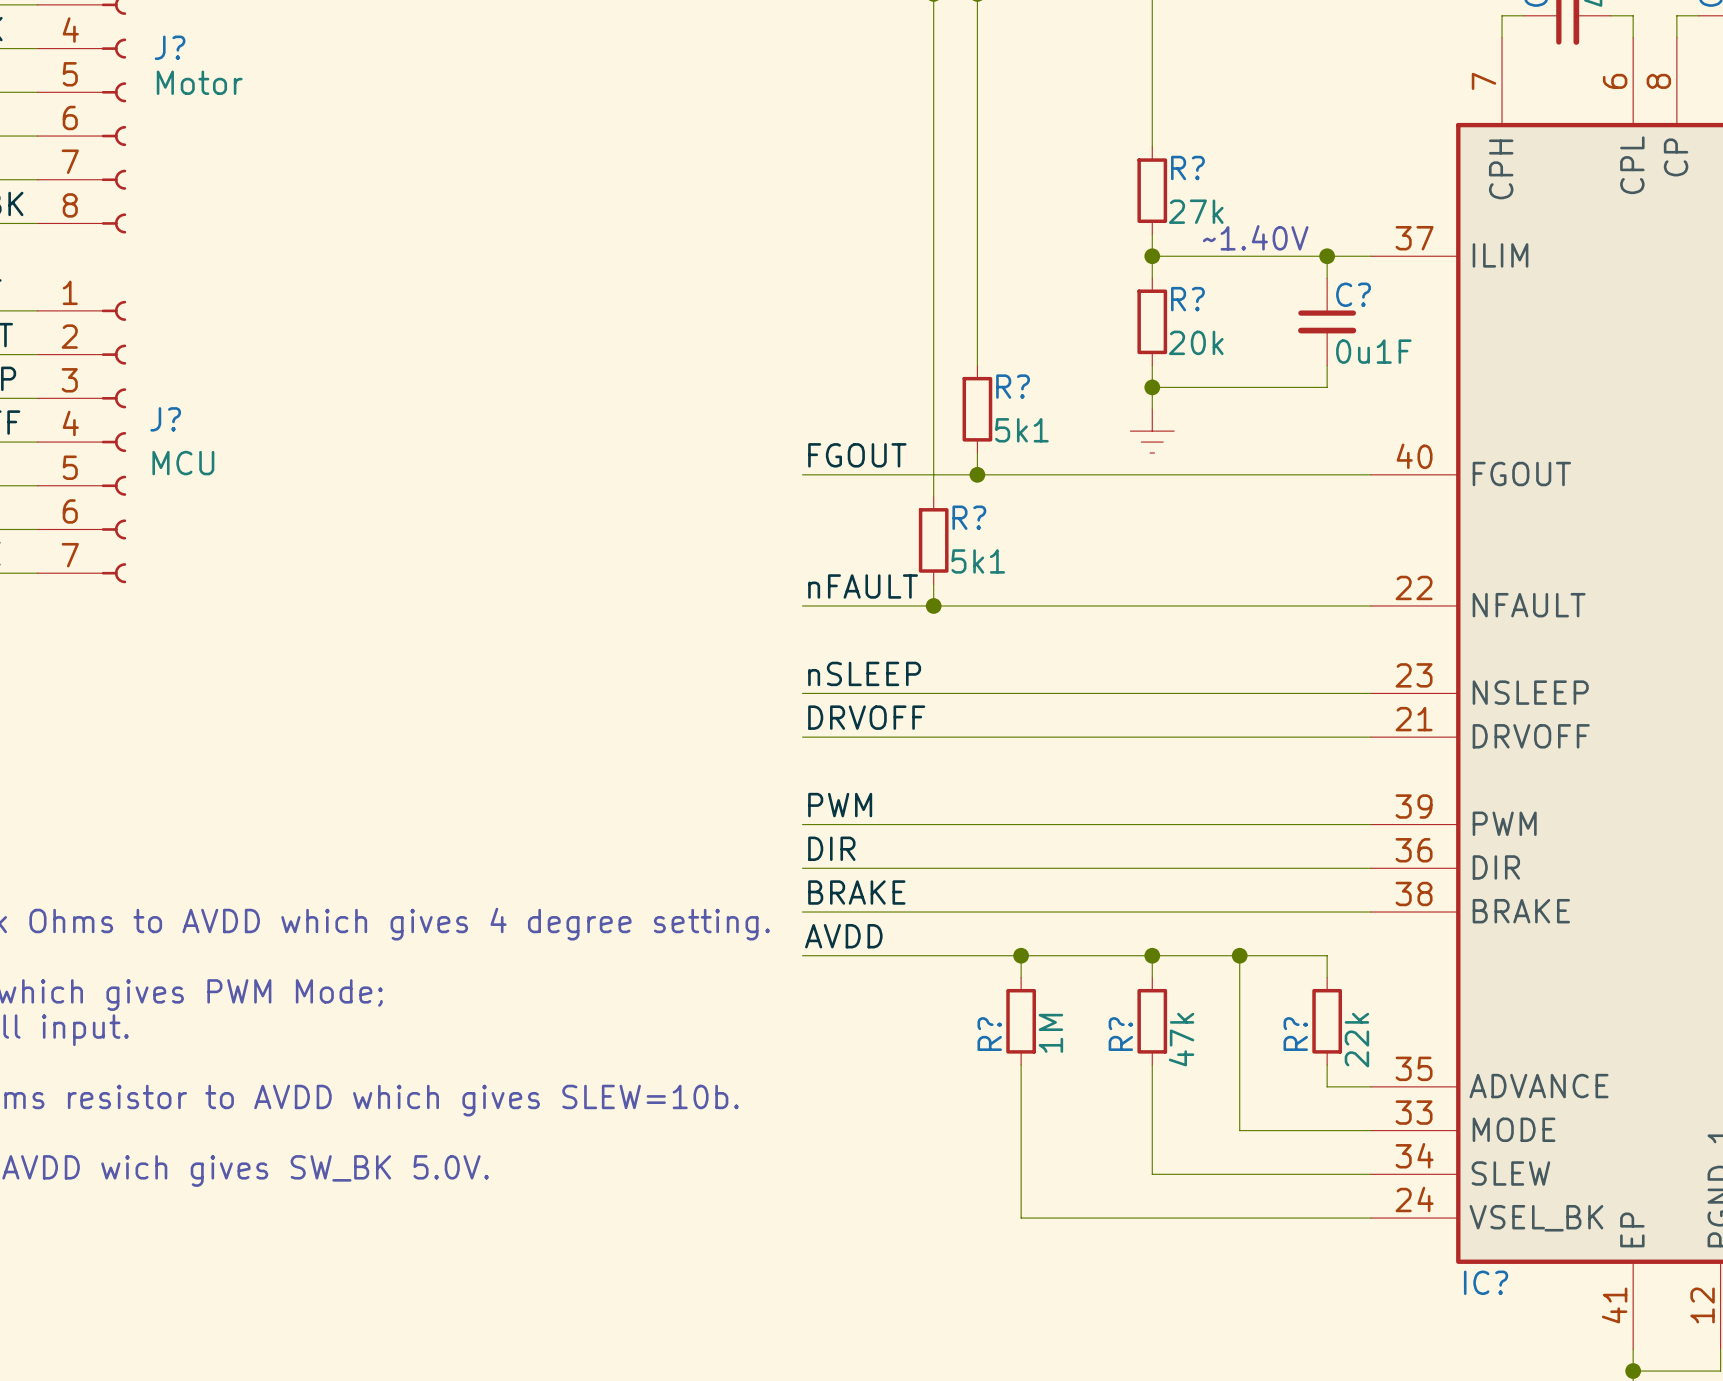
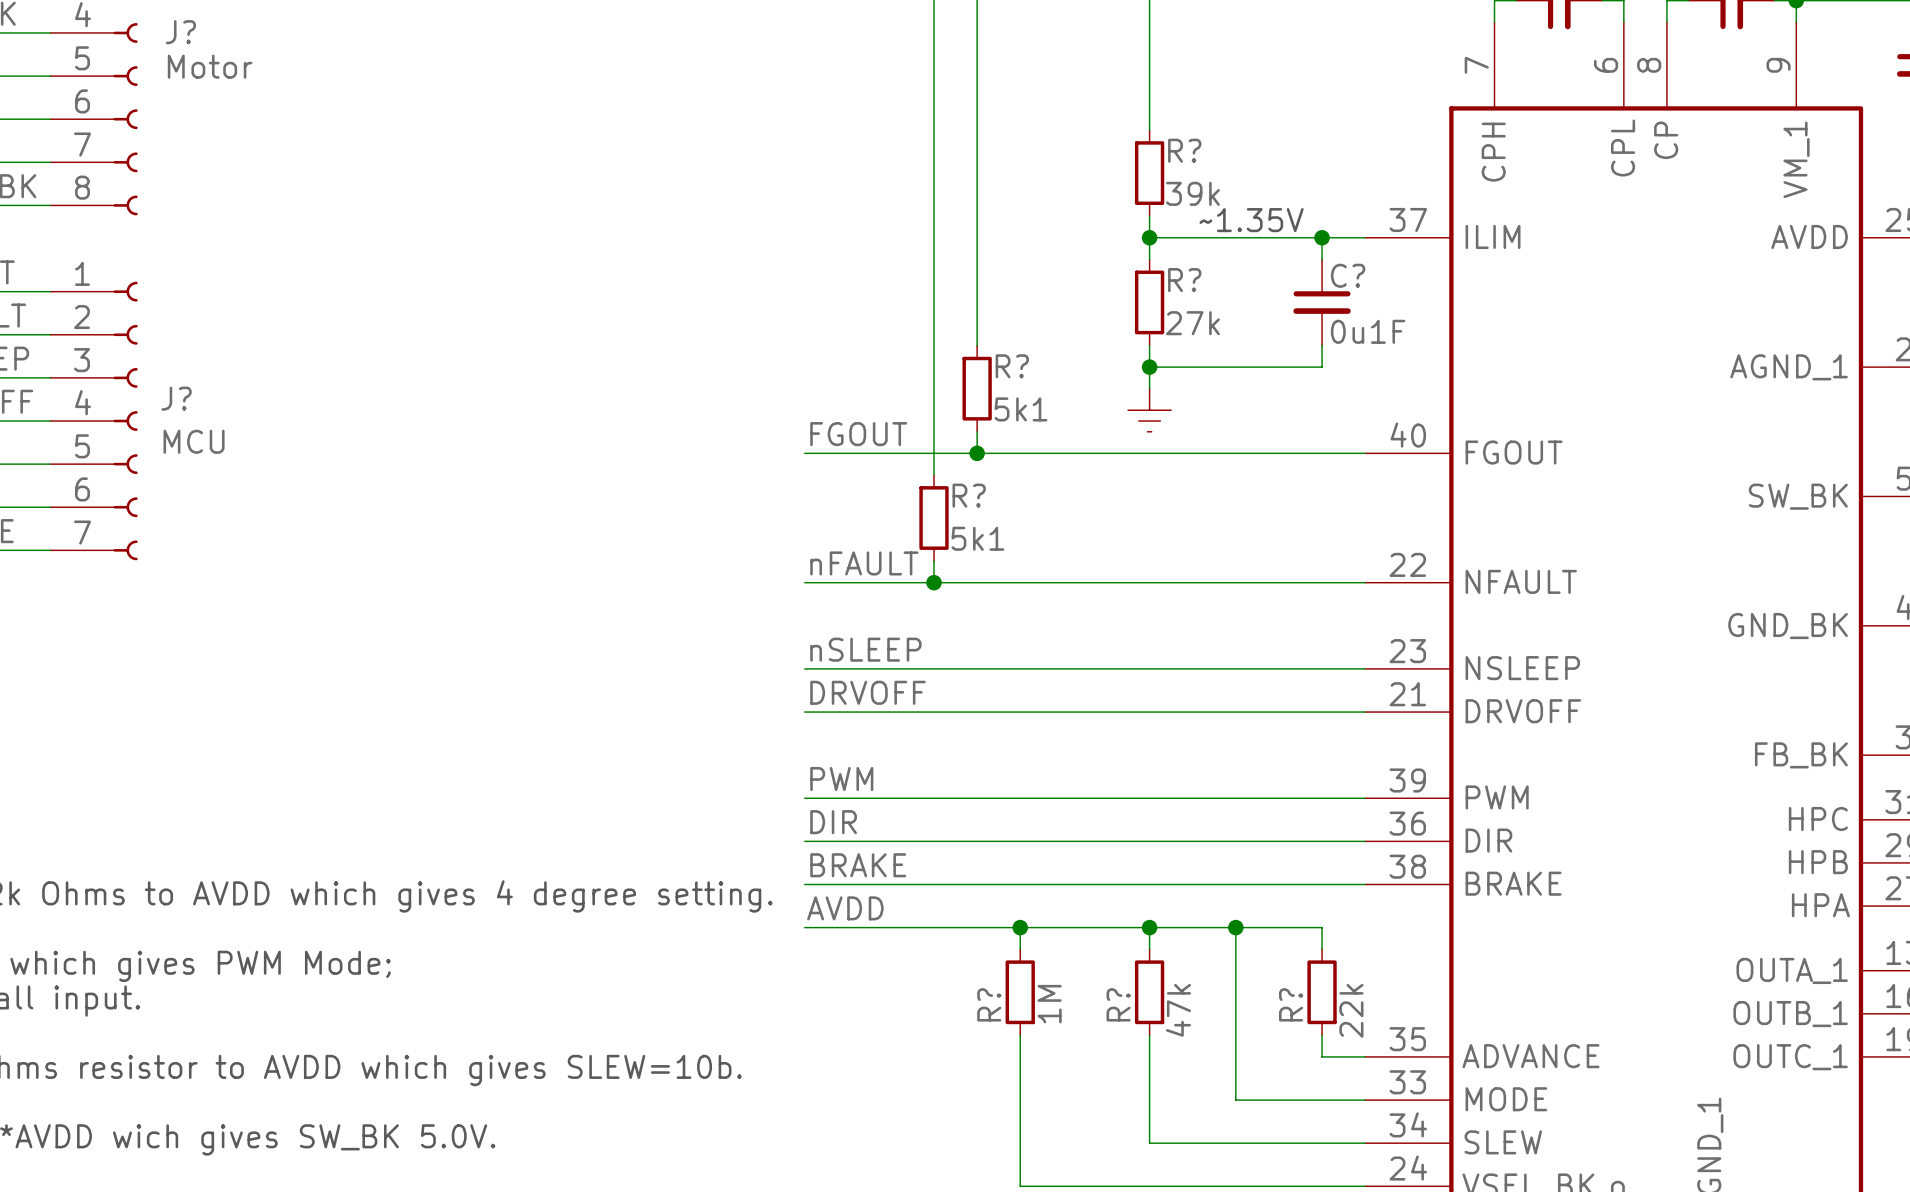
R? value: 27k (1196, 211) -> 39k (1192, 193)
text: ~1.40V (1255, 237) -> ~1.35V (1251, 220)
R? value: 20k (1196, 342) -> 27k (1192, 323)

